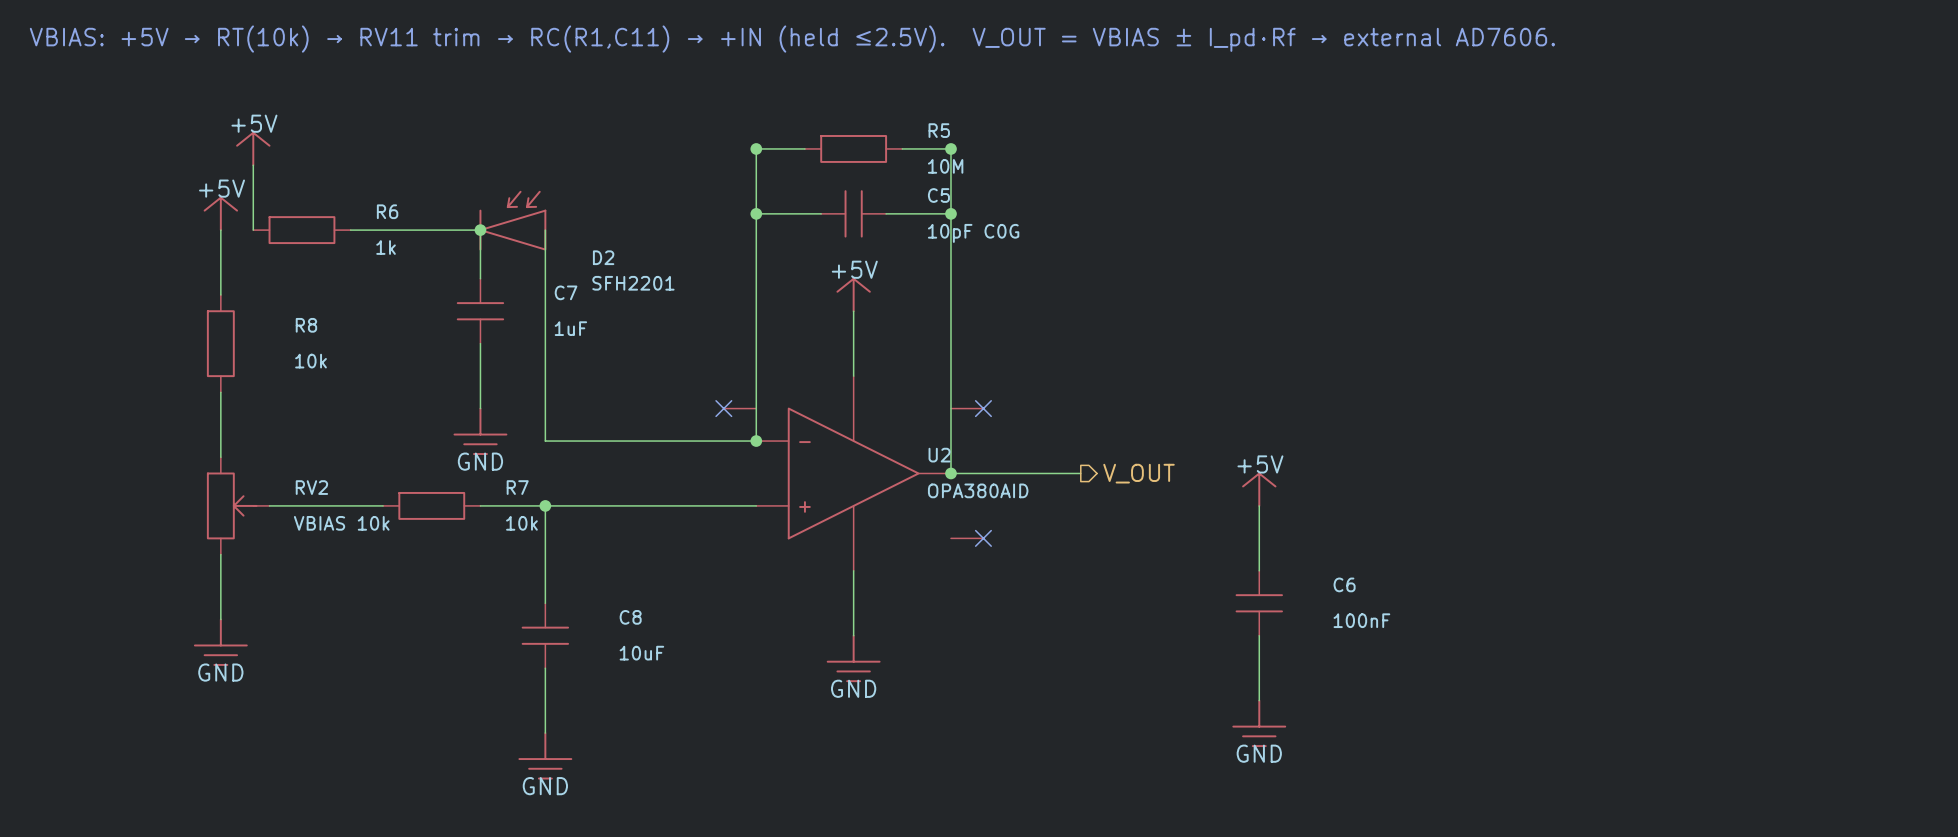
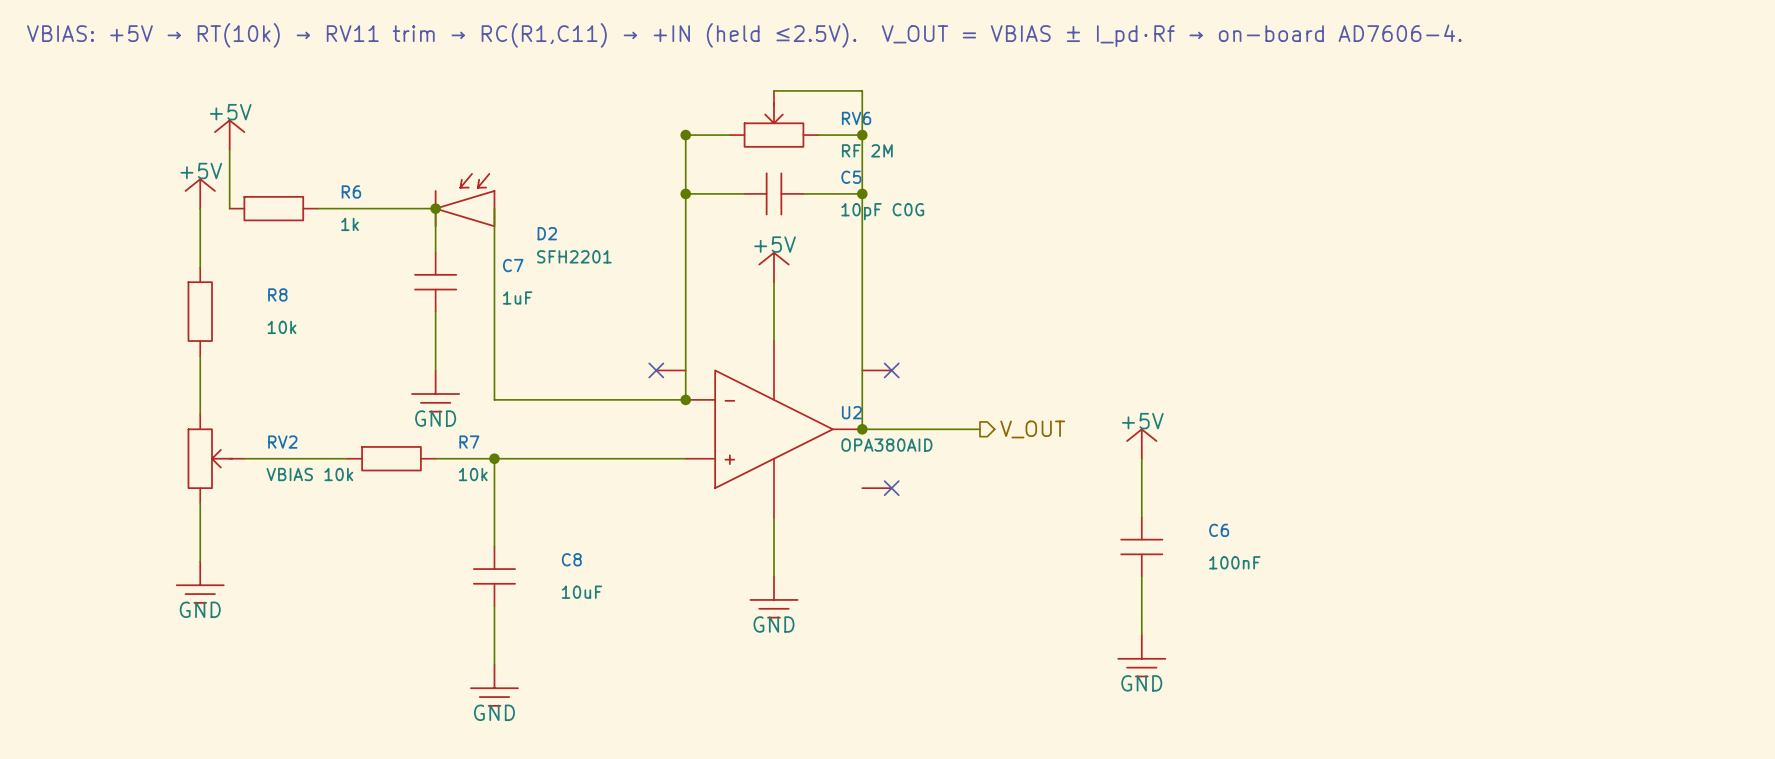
text: VBIAS: +5V → RT(10k) → RV11 trim → RC(R1,C11) → +IN (held ≤2.5V). V_OUT = VBIAS ± I_pd·Rf → external AD7606. (792, 39) -> VBIAS: +5V → RT(10k) → RV11 trim → RC(R1,C11) → +IN (held ≤2.5V). V_OUT = VBIAS ± I_pd·Rf → on-board AD7606-4. (744, 35)
wire: none -> (773, 90) (862, 90) (862, 135)
RV6: none -> RF 2M (773, 119)
R5: 10M (853, 148) -> none

